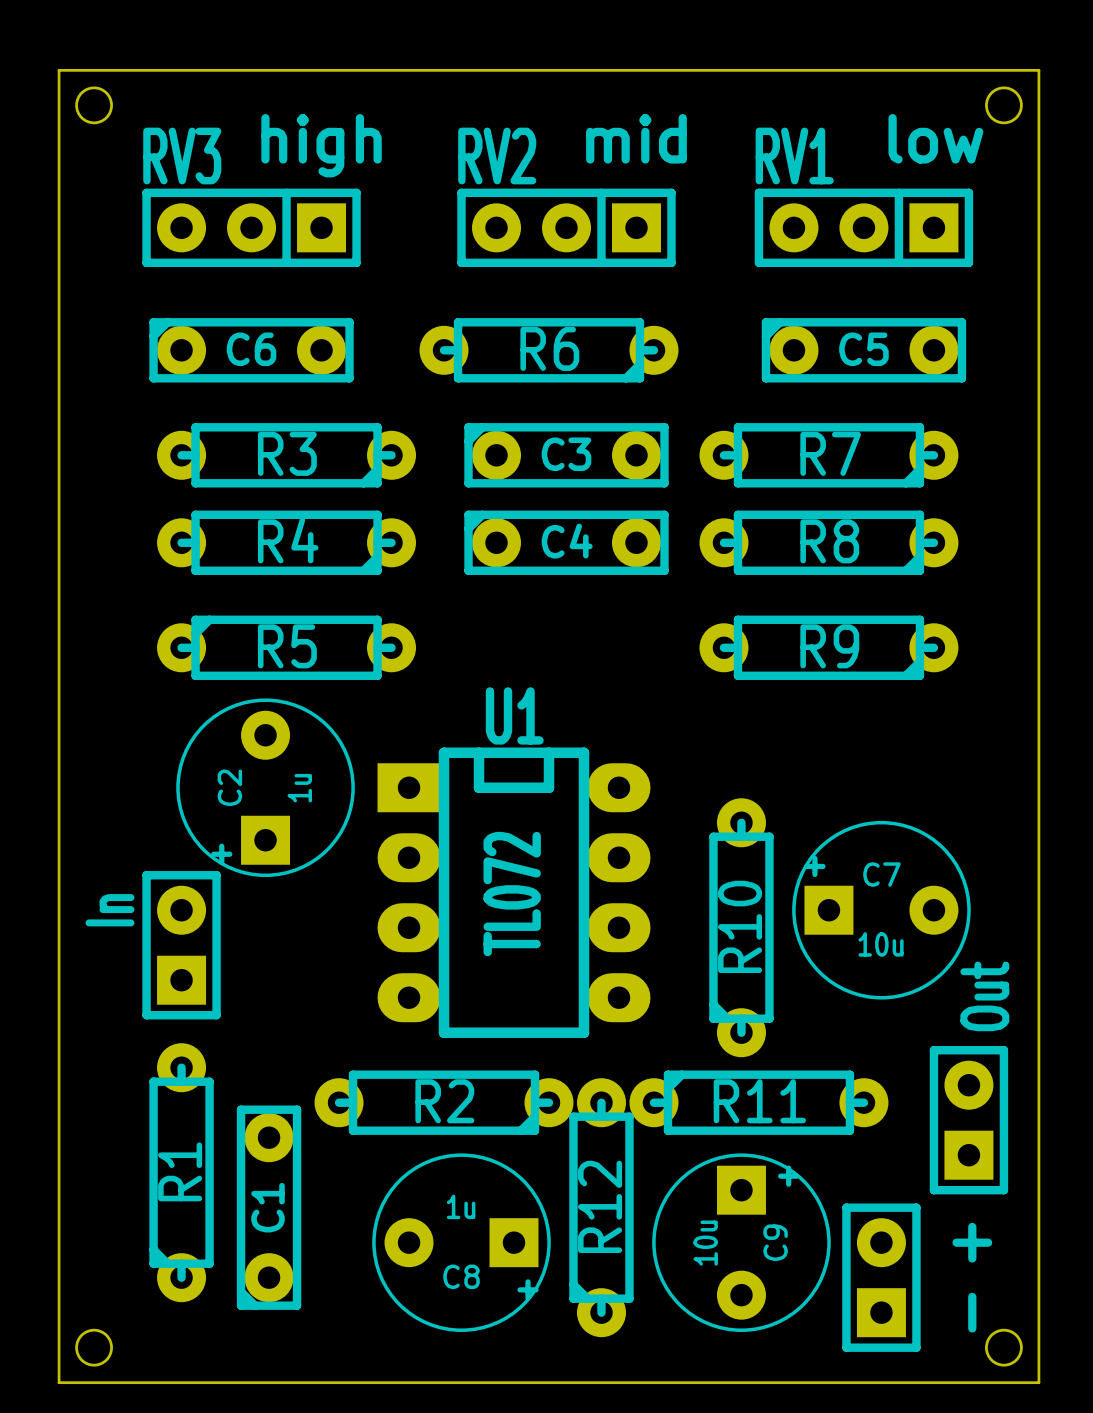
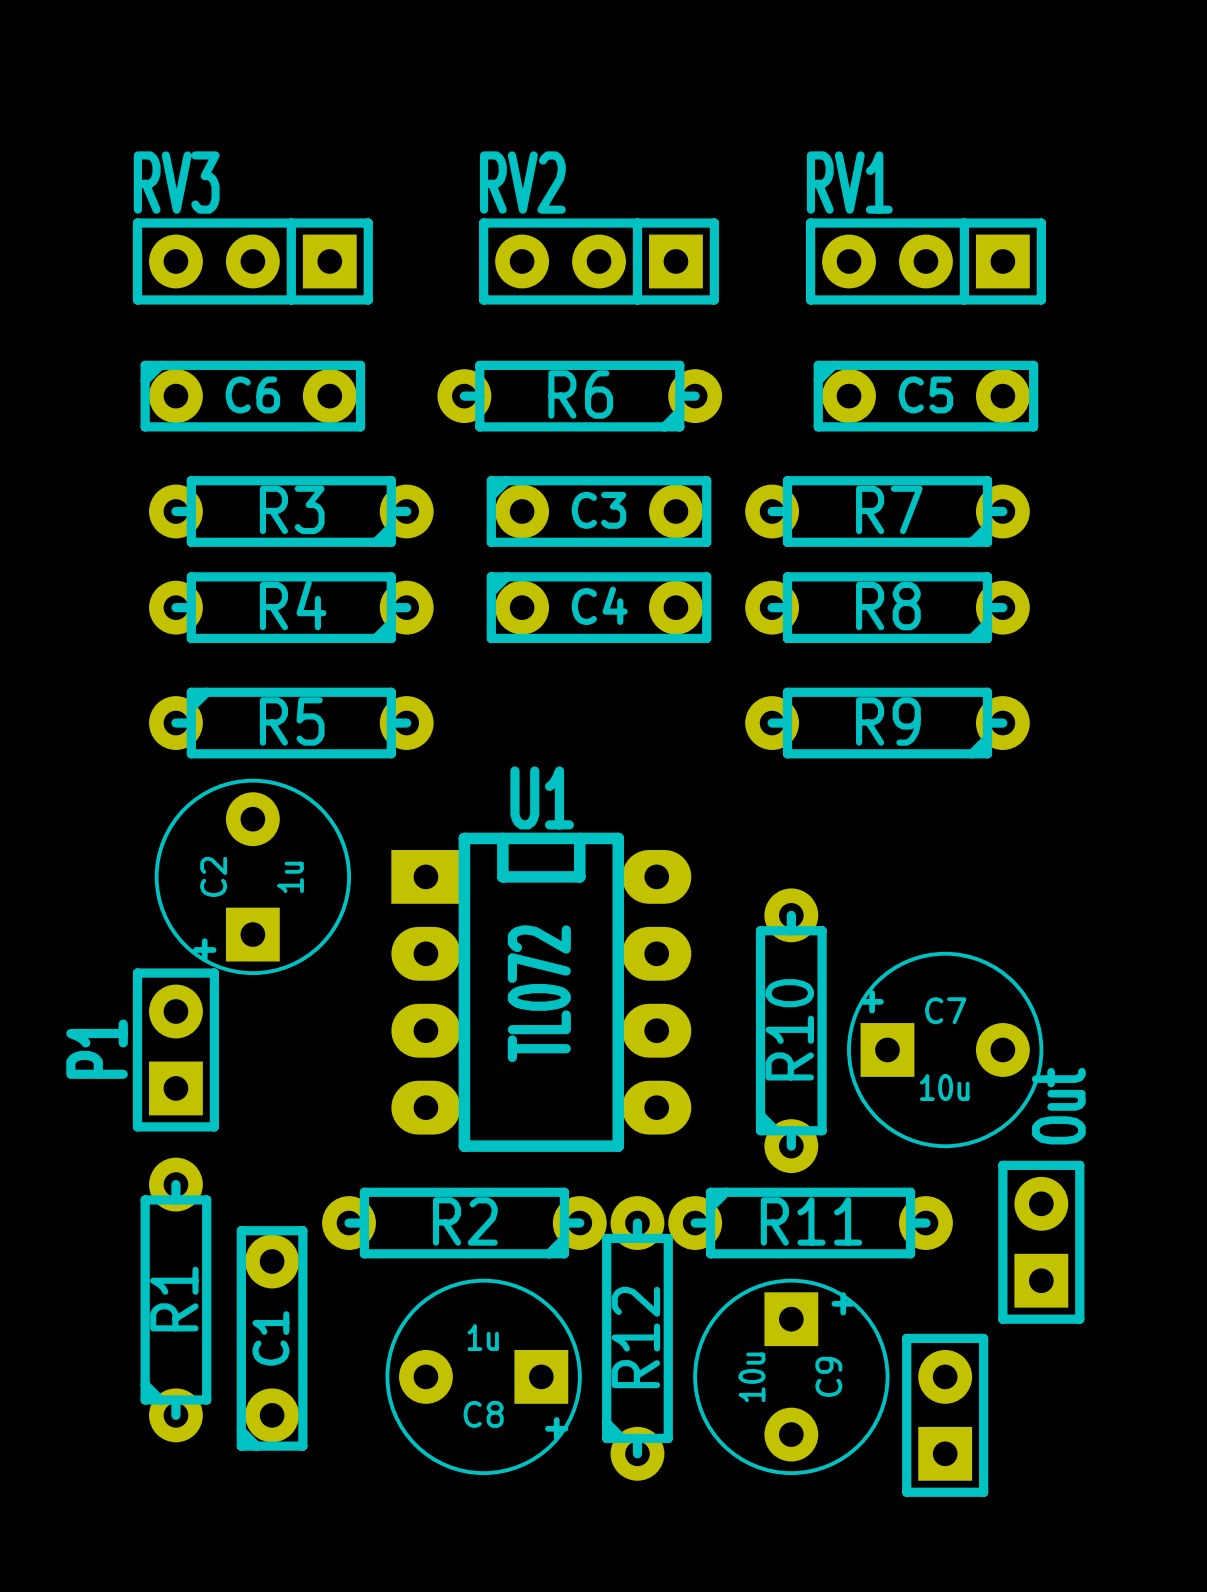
board edge: (59, 70) (1038, 70) (1038, 1382) (59, 1382) (59, 70) -> none
round board edge: [75, 86, 113, 125] -> none
round board edge: [985, 86, 1023, 125] -> none
text: mid (636, 138) -> none
text: low (935, 138) -> none
text: high (321, 145) -> none
C2 position: (265, 787) -> (252, 876)
P1 value: In (109, 910) -> none
C7 position: (881, 910) -> (945, 1049)
P1 name: none -> P1 (97, 1049)
text: + (972, 1242) -> none
text: - (972, 1312) -> none
round board edge: [75, 1328, 113, 1367] -> none
round board edge: [985, 1328, 1023, 1367] -> none

